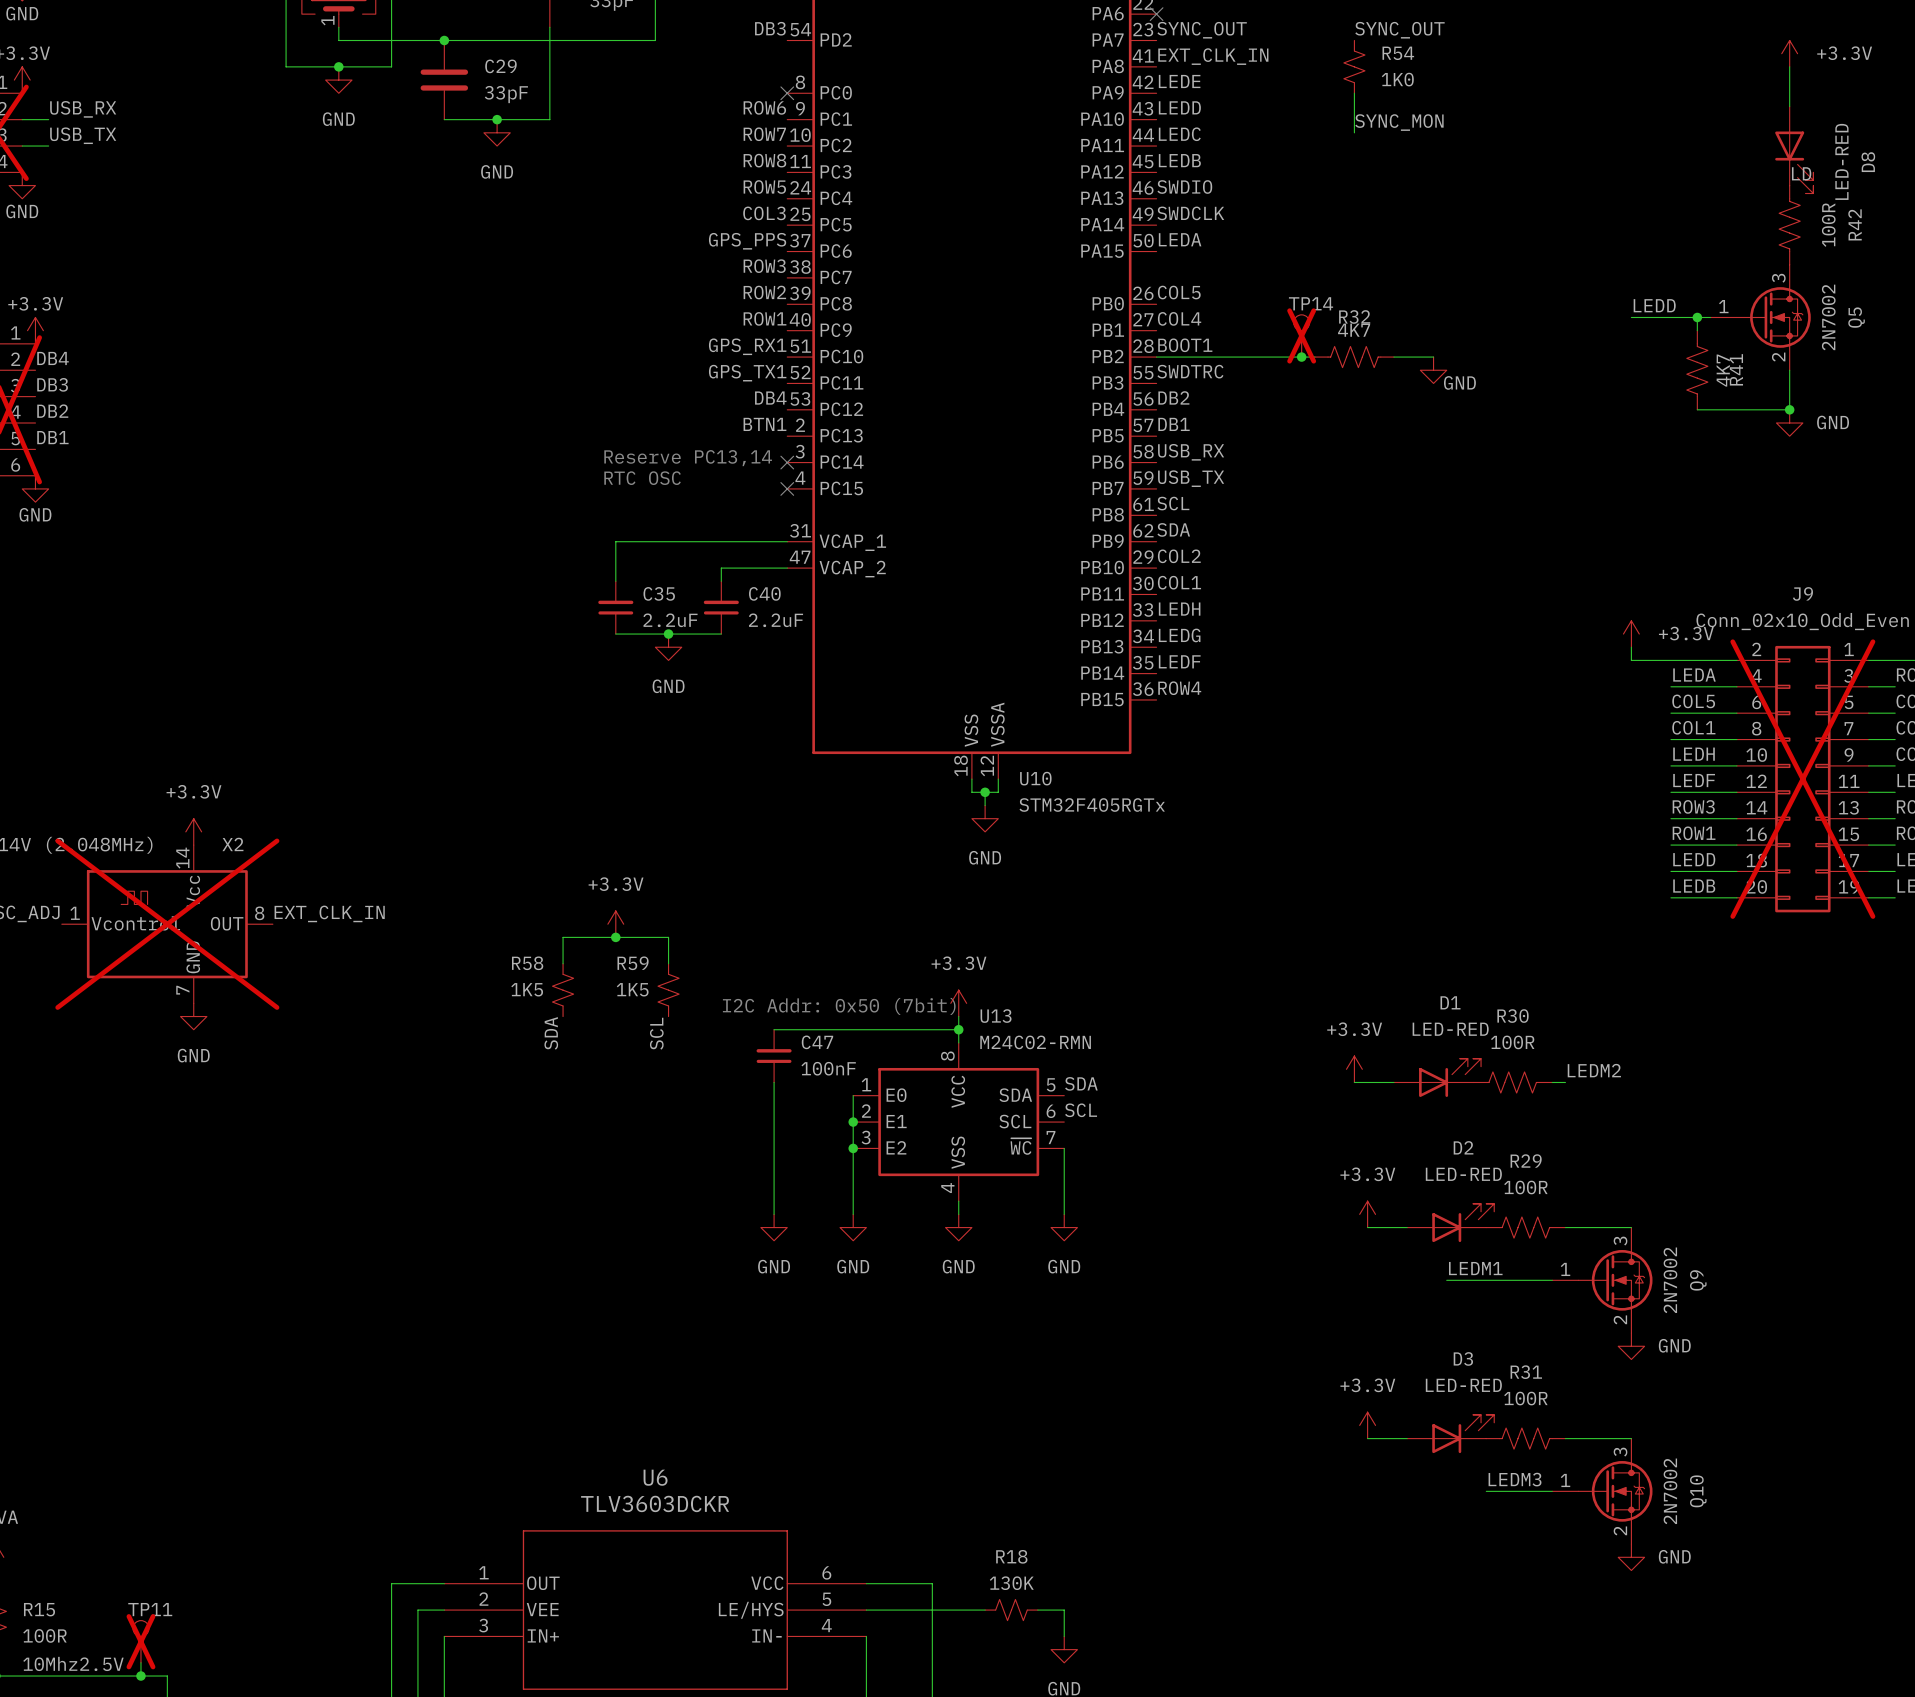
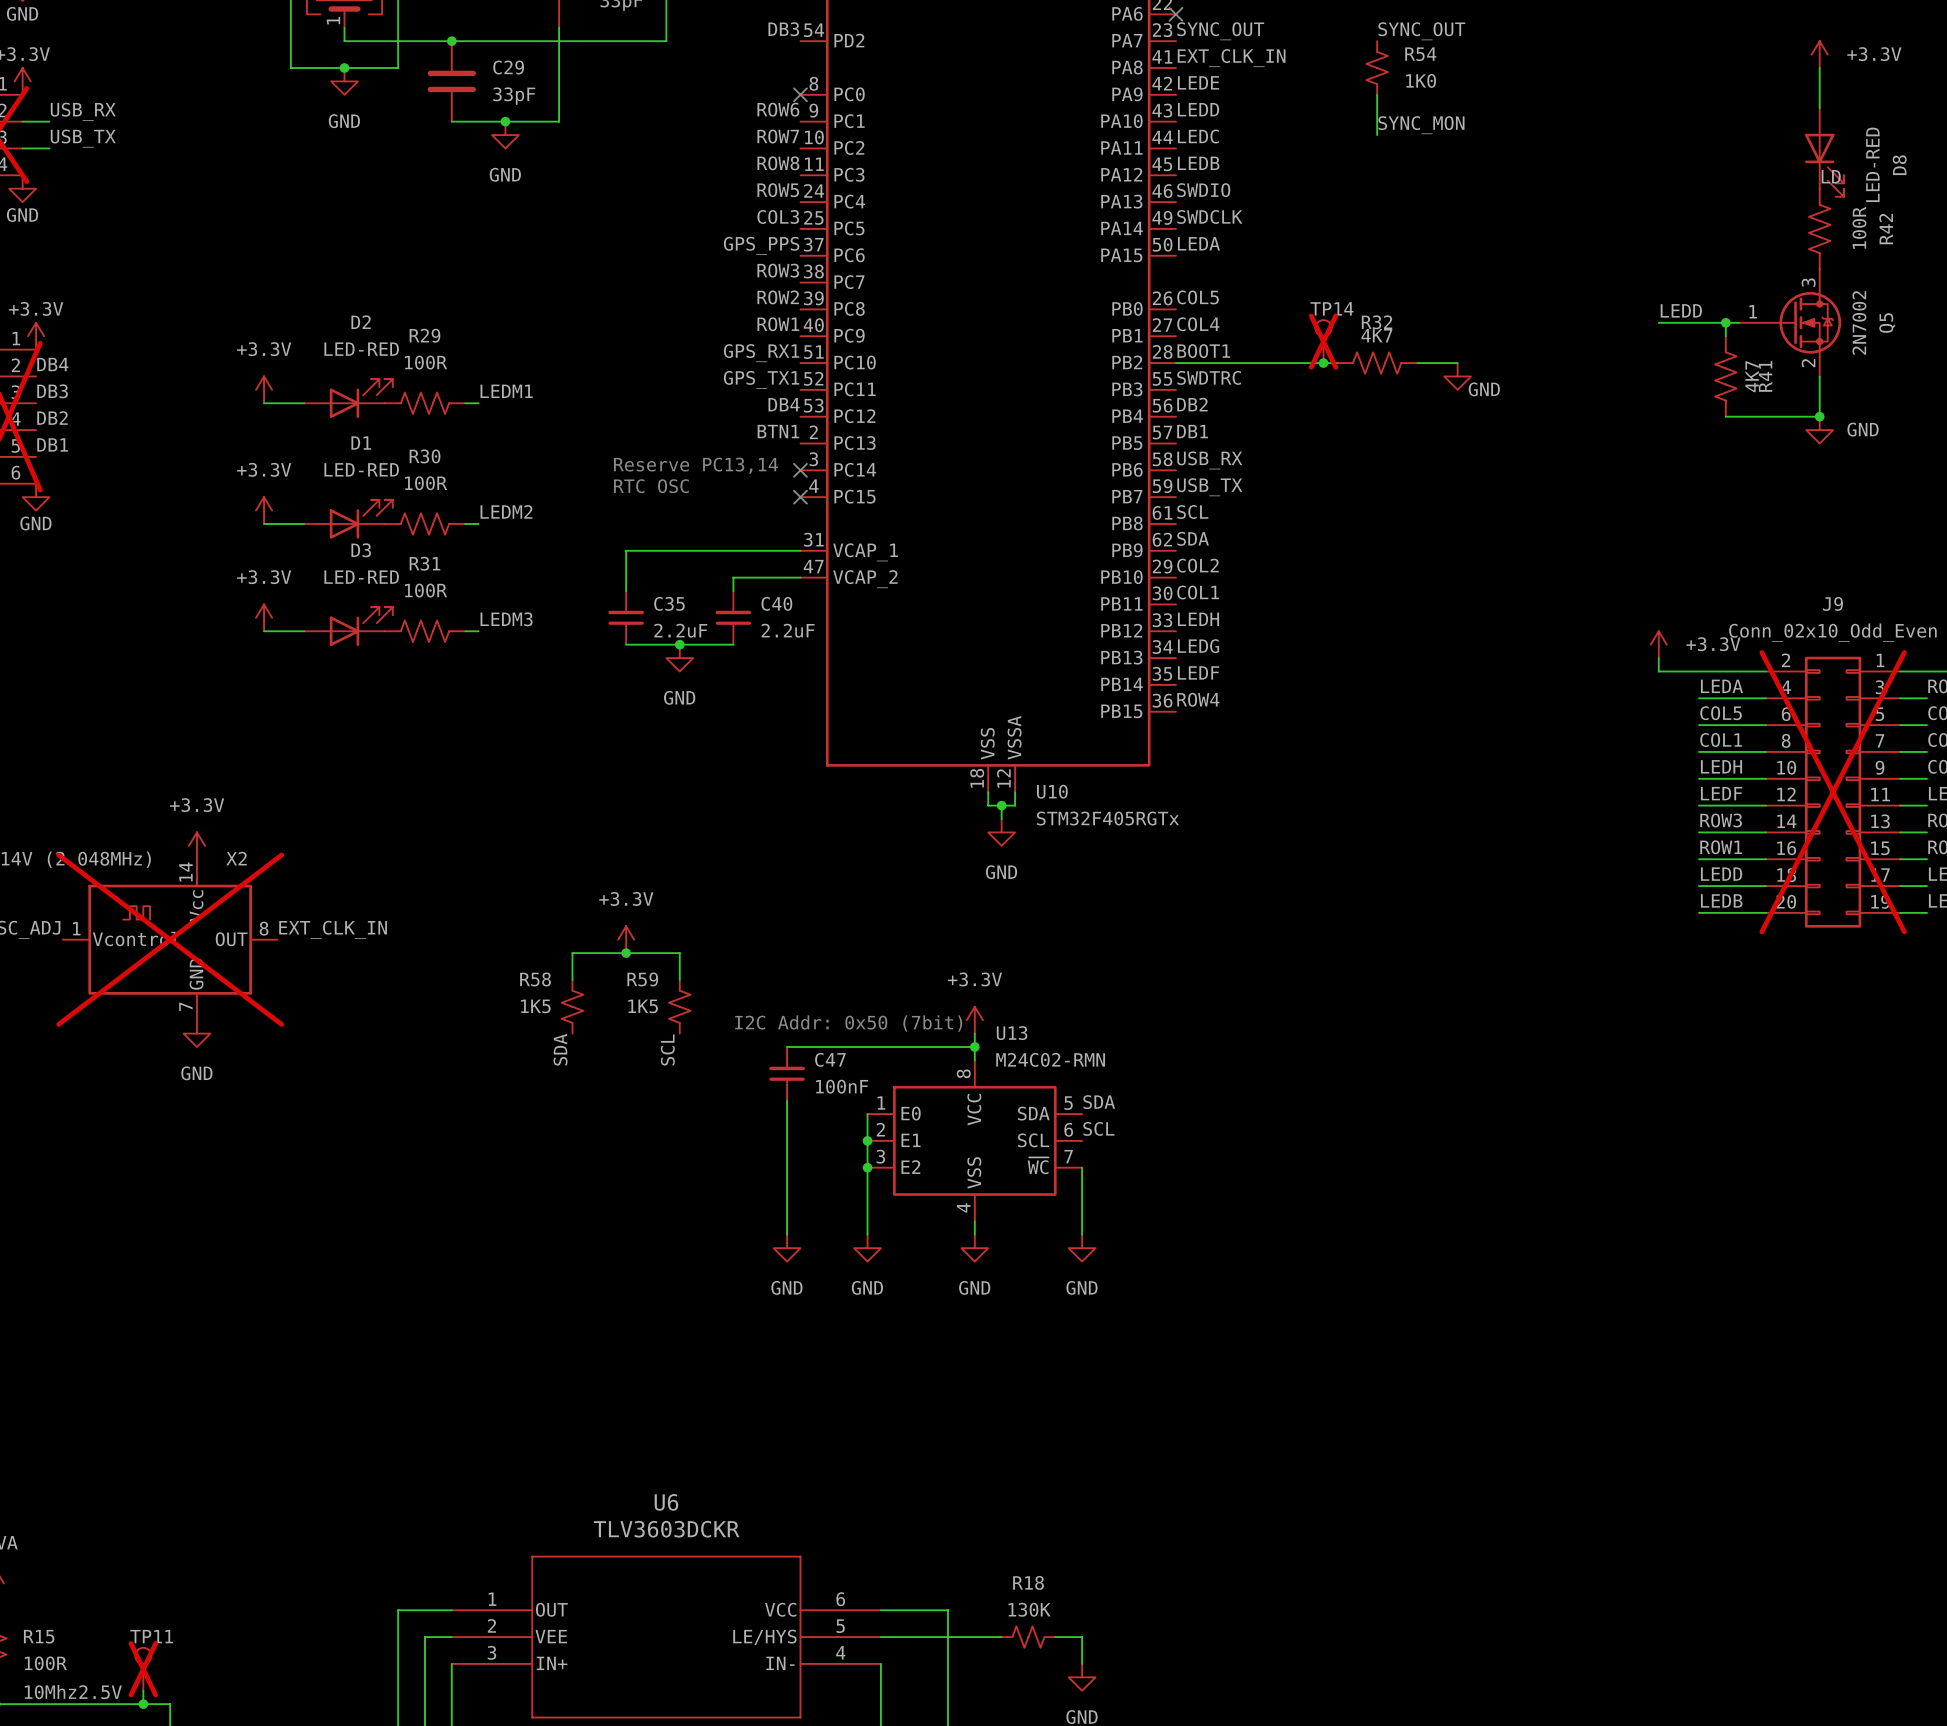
power symbol: none -> +3.3V (264, 389)
label: none -> LEDM1 (506, 391)
wire: none -> (264, 403) (304, 403)
wire: none -> (465, 403) (478, 403)
power symbol: none -> +3.3V (264, 510)
label: none -> LEDM2 (506, 511)
wire: none -> (264, 523) (304, 523)
wire: none -> (465, 523) (478, 523)
power symbol: none -> +3.3V (264, 617)
label: none -> LEDM3 (506, 619)
wire: none -> (264, 631) (304, 631)
wire: none -> (465, 631) (478, 631)
power symbol: +3.3V (1354, 1069) -> none
label: LEDM2 (1594, 1070) -> none
D1 position: (1437, 1077) -> (348, 519)
wire: (1354, 1082) (1393, 1082) -> none
R30 position: (1512, 1082) -> (424, 523)
wire: (1552, 1082) (1565, 1082) -> none
power symbol: +3.3V (1367, 1214) -> none
D2 position: (1450, 1222) -> (348, 398)
wire: (1367, 1227) (1407, 1227) -> none
R29 position: (1525, 1227) -> (424, 403)
wire: (1565, 1227) (1631, 1227) -> none
label: LEDM1 (1475, 1268) -> none
wire: (1446, 1280) (1552, 1280) -> none
Q9: 2N7002 (1602, 1280) -> none
power symbol: GND (1631, 1346) -> none
power symbol: +3.3V (1367, 1425) -> none
D3 position: (1450, 1433) -> (348, 626)
wire: (1367, 1438) (1407, 1438) -> none
R31 position: (1525, 1438) -> (424, 631)
wire: (1565, 1438) (1631, 1438) -> none
label: LEDM3 (1515, 1479) -> none
wire: (1486, 1491) (1552, 1491) -> none
Q10: 2N7002 (1602, 1491) -> none
power symbol: GND (1631, 1557) -> none

